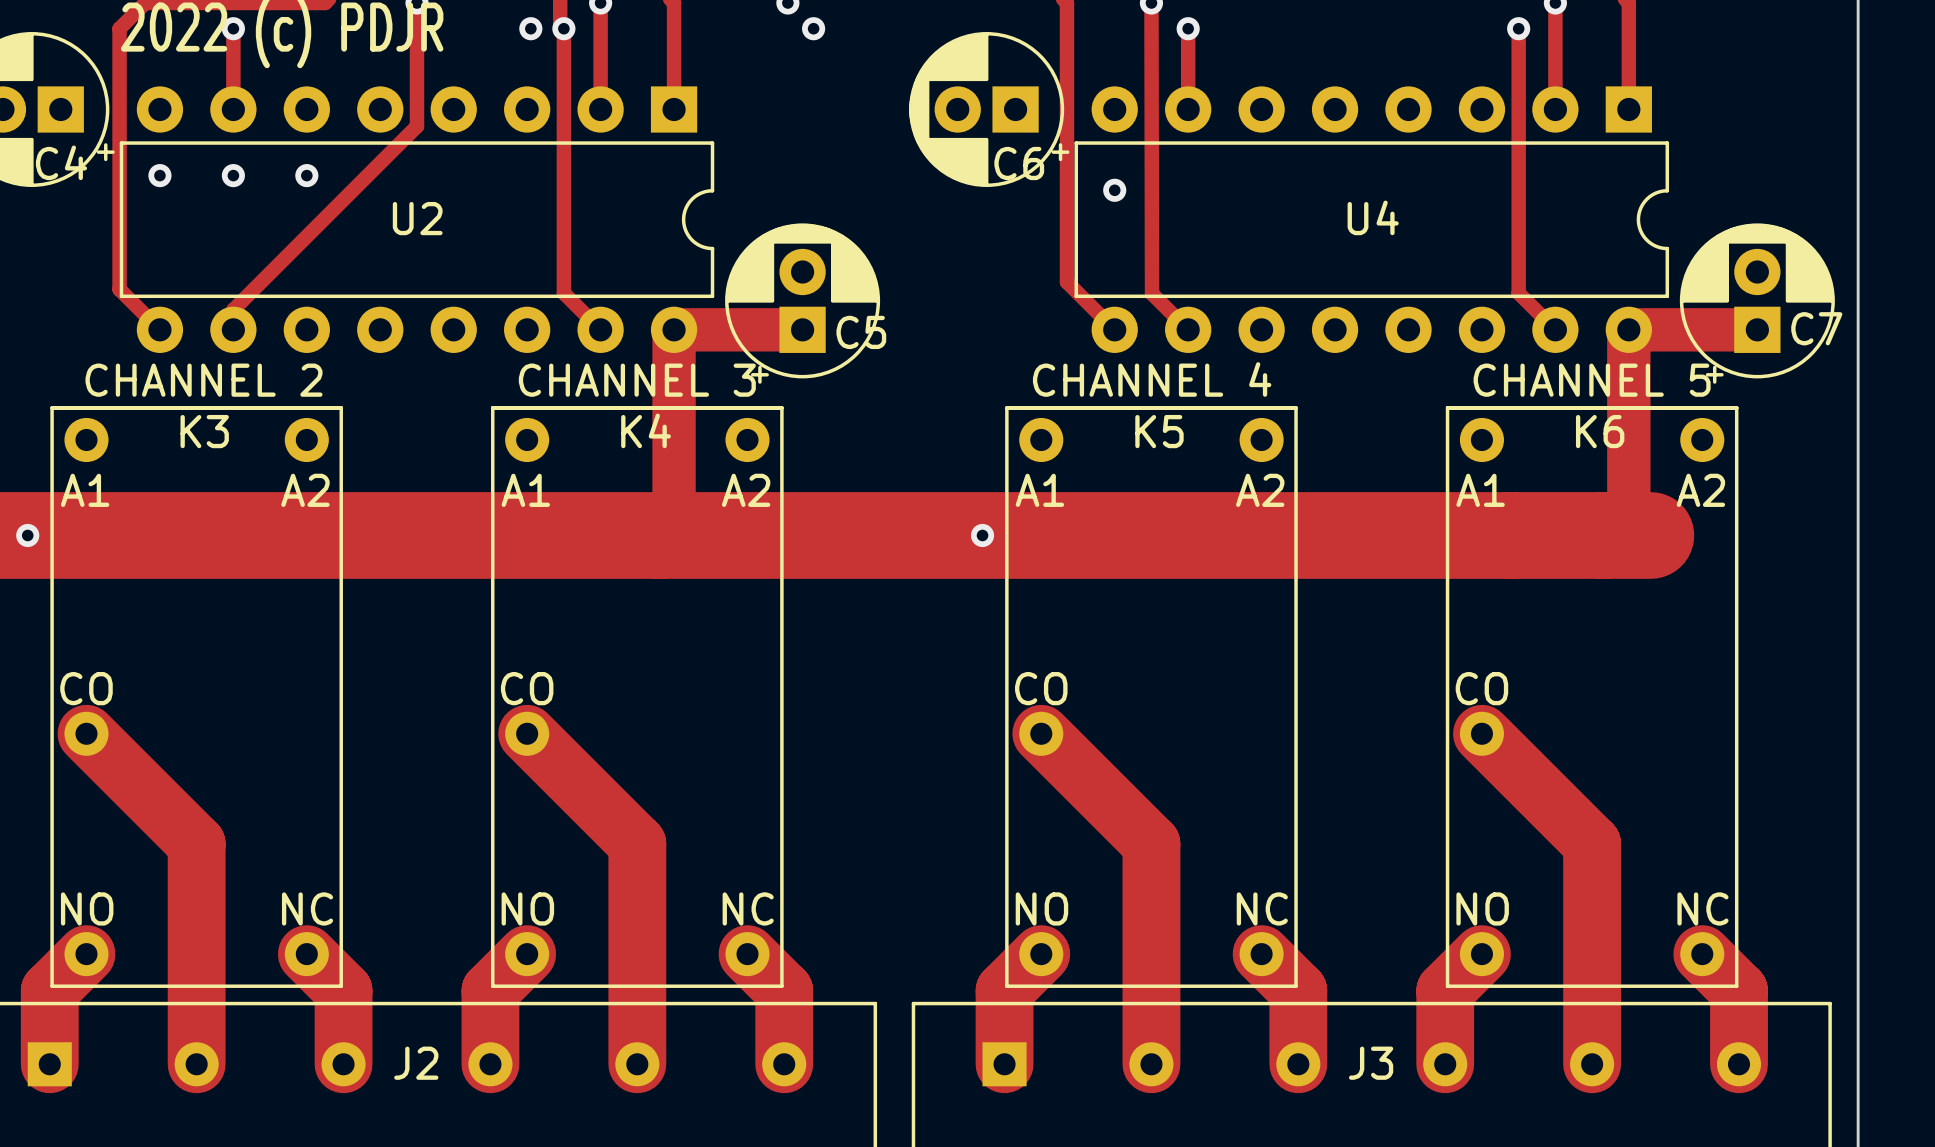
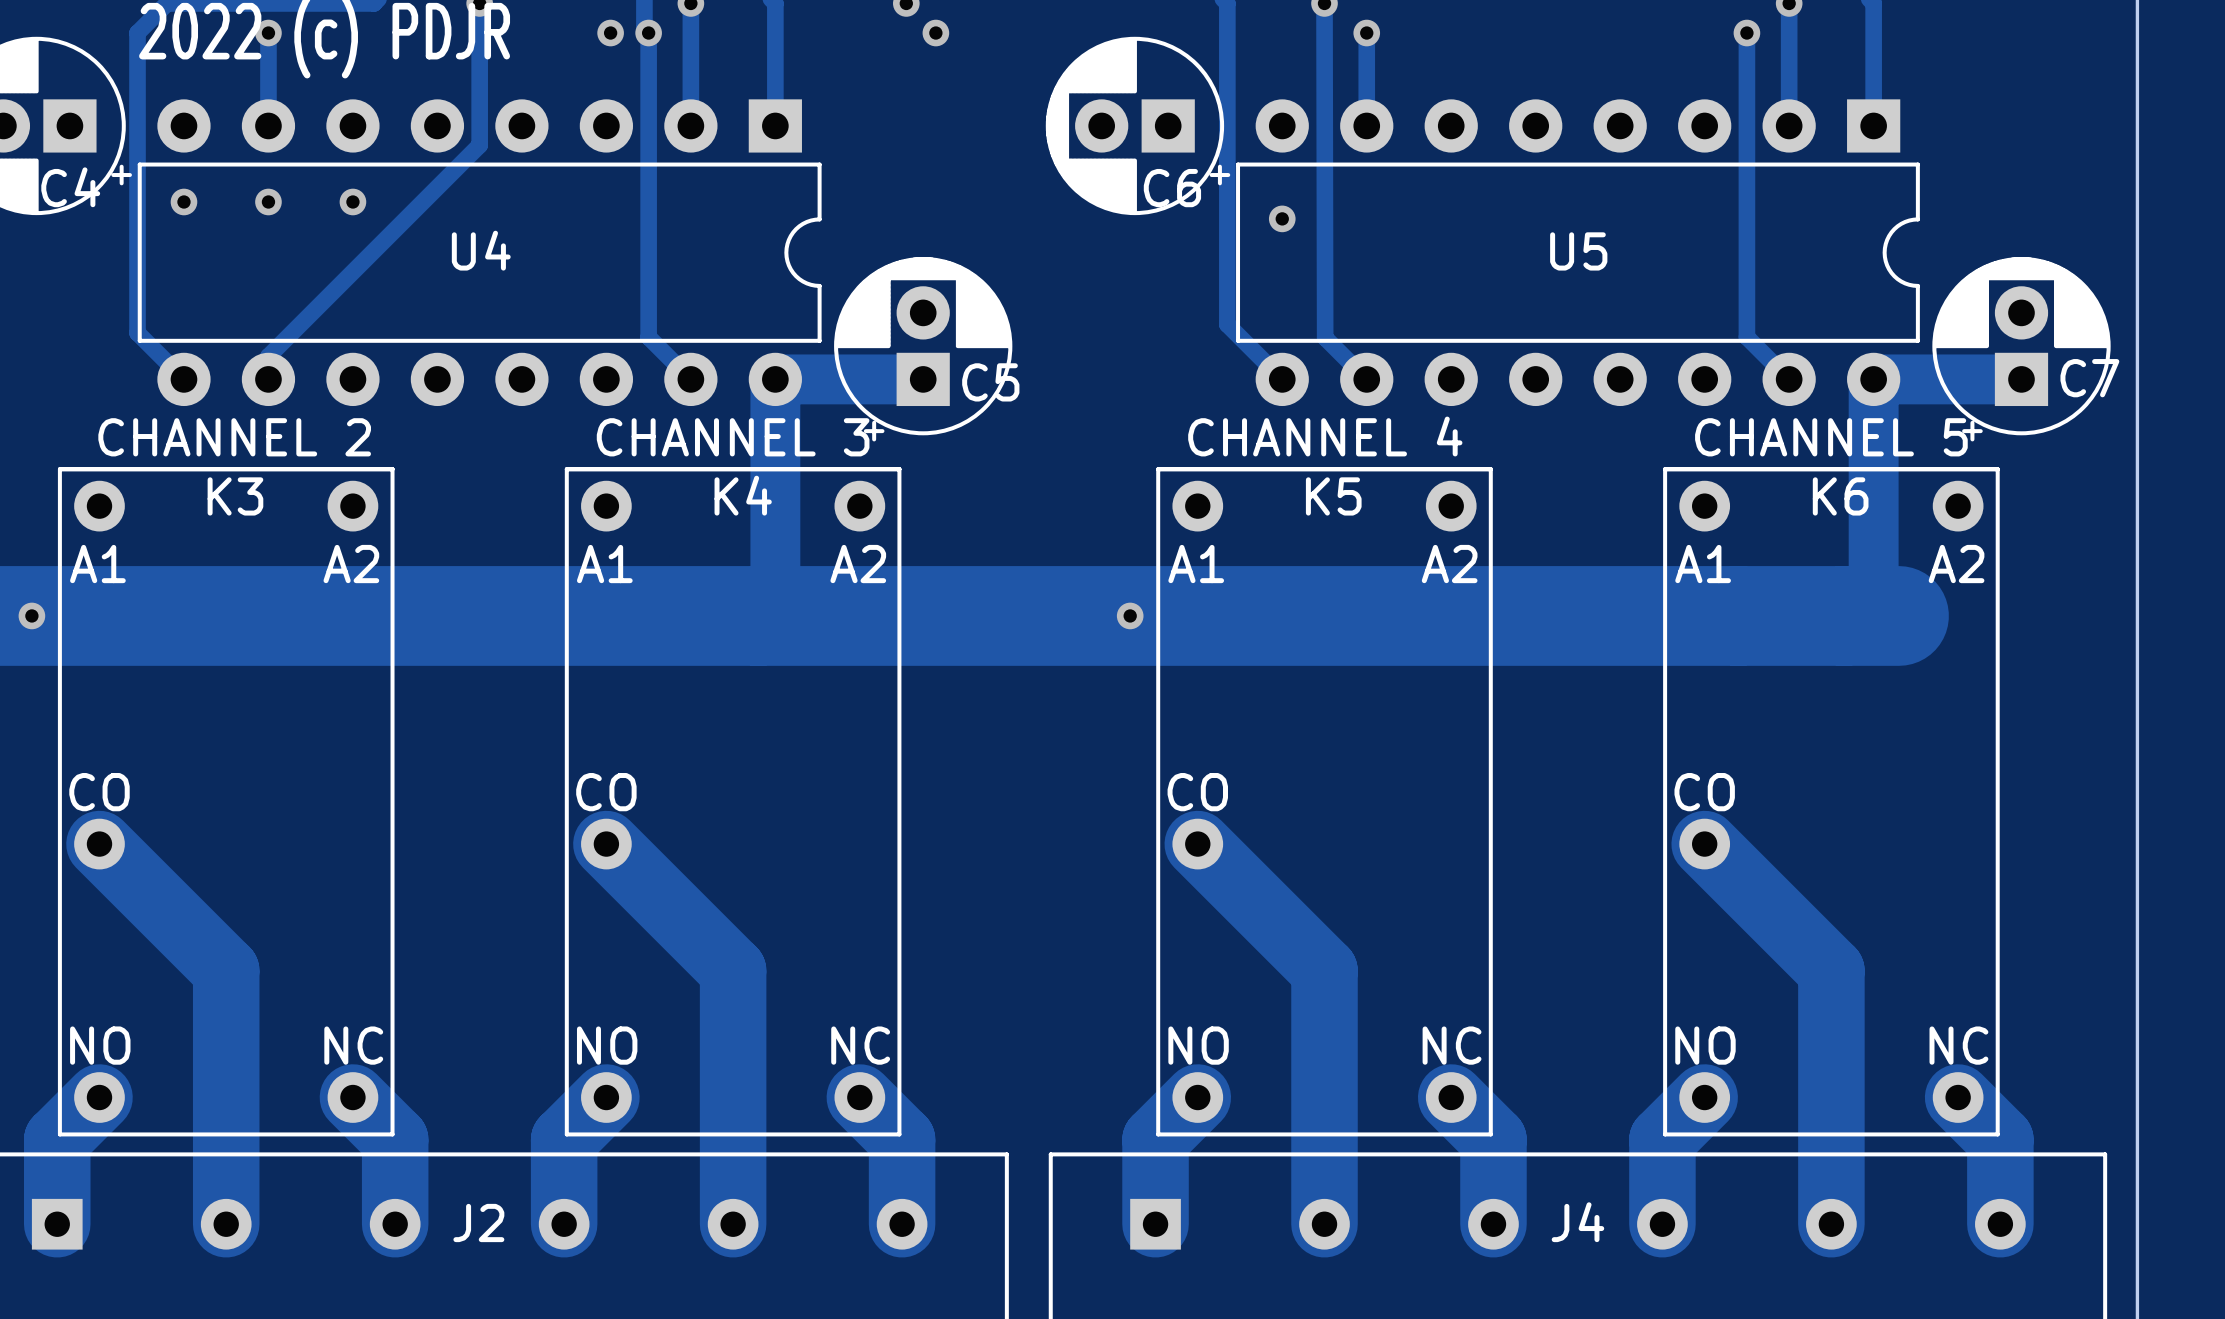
U4 name: U4 (1373, 217) -> U5 (1578, 251)
U2 name: U2 (417, 218) -> U4 (481, 250)
J3 name: J3 (1371, 1063) -> J4 (1577, 1222)

